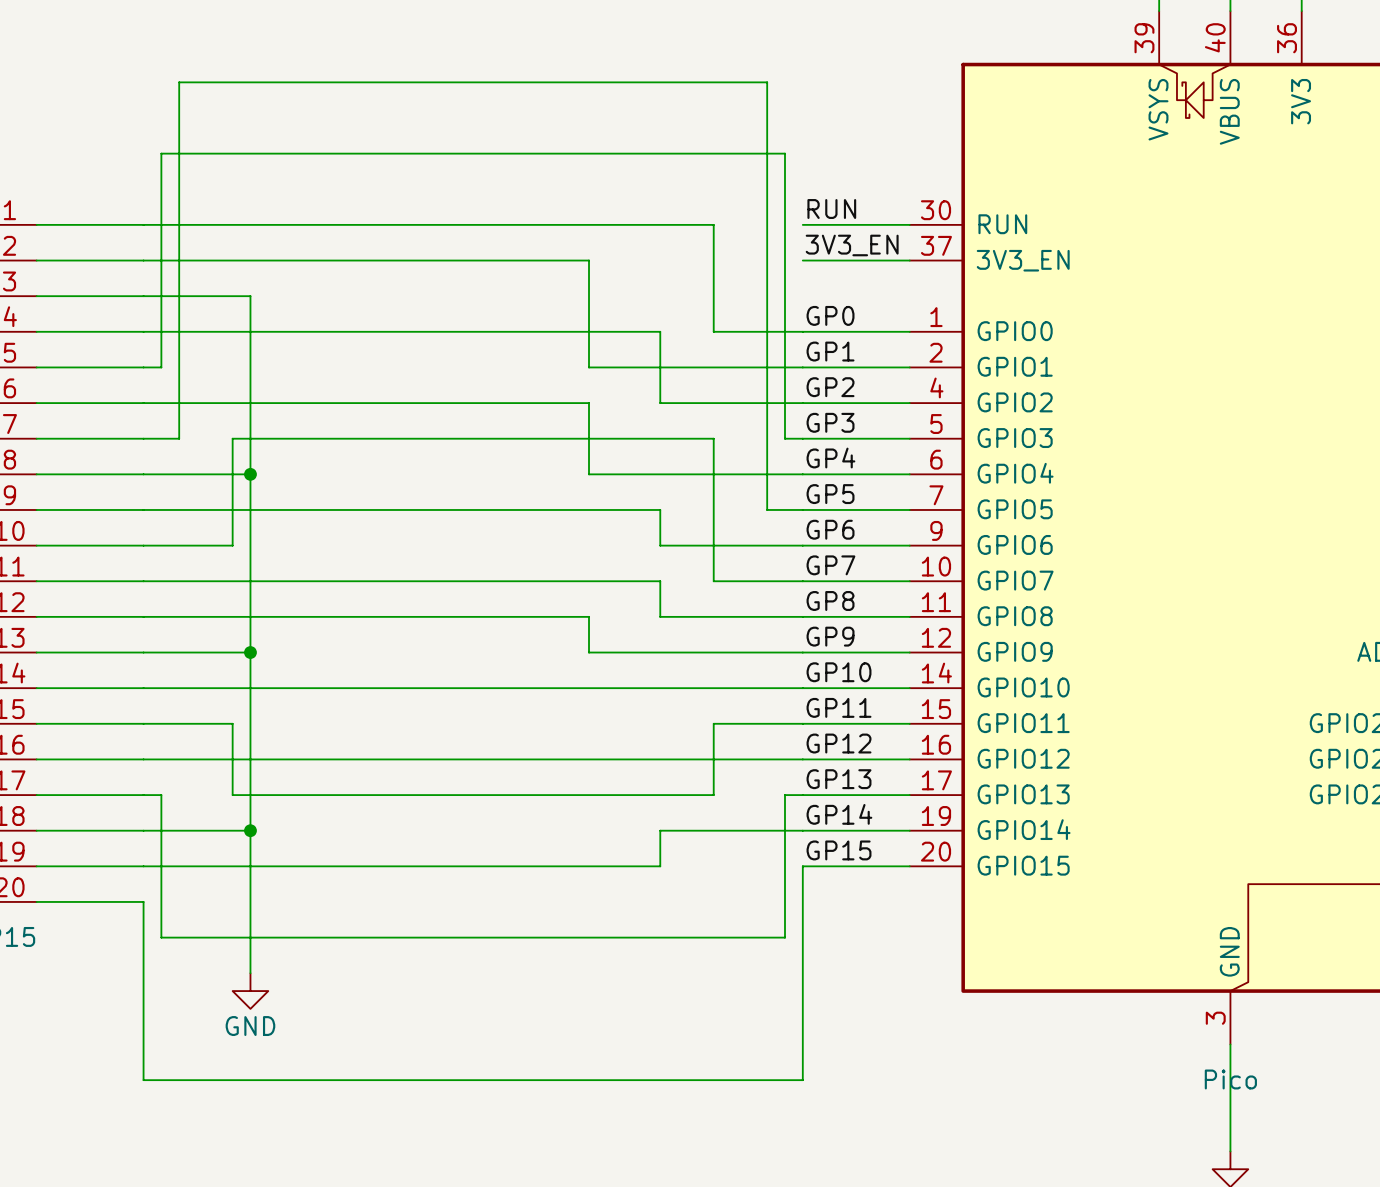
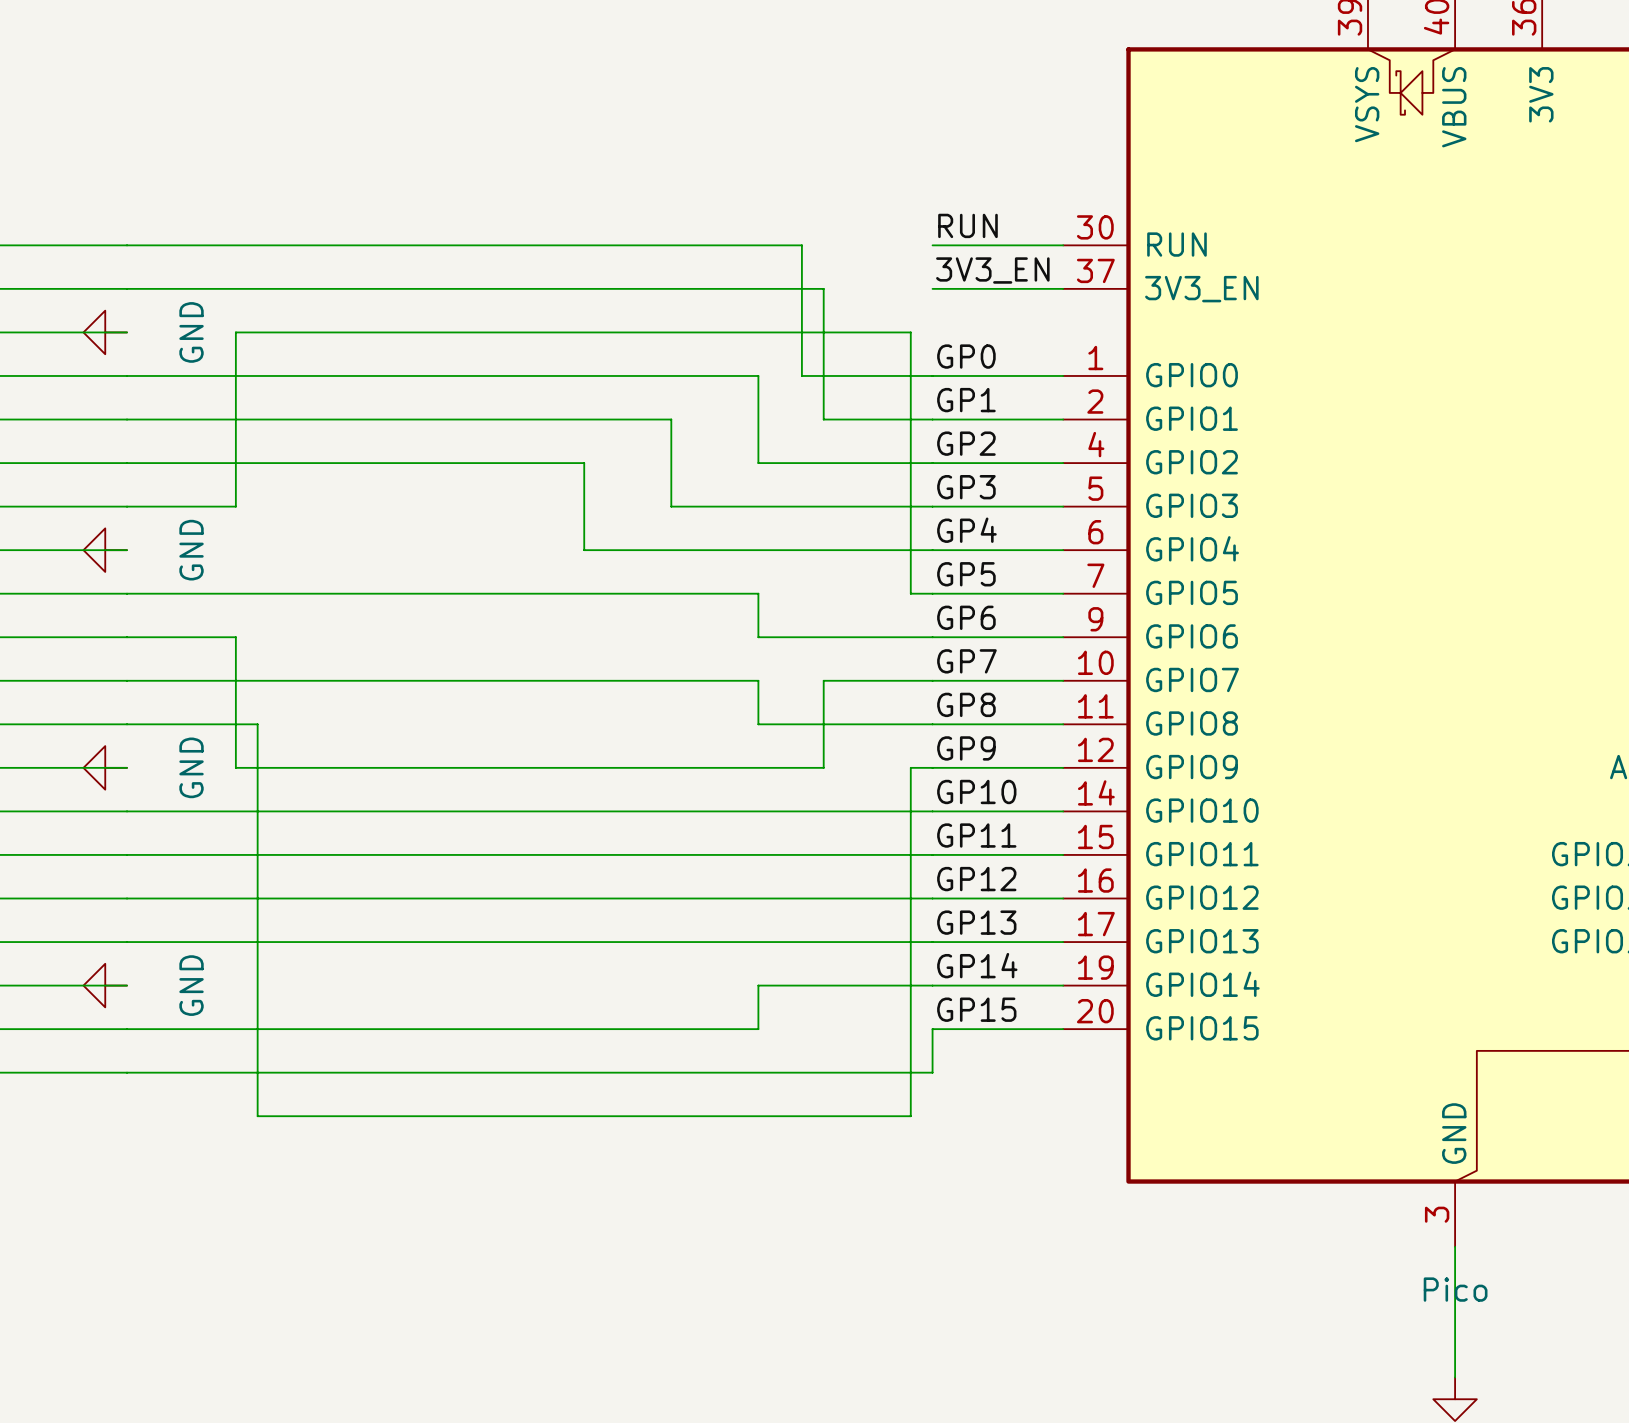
wire: (695, 224) (713, 224) (713, 260) -> (801, 245) (801, 375) (823, 375) (823, 419)
wire: (589, 260) (589, 367) (713, 367) -> (671, 288) (823, 288)
power symbol: none -> GND (105, 332)
wire: (143, 296) (232, 296) -> (170, 506) (235, 506) (235, 332)
wire: (250, 296) (250, 616) (589, 616) (589, 652) -> (257, 767) (671, 767)
wire: (784, 296) (784, 153) (161, 153) (161, 367) -> (910, 332) (257, 332)
wire: none -> (148, 419) (671, 419) (671, 463)
wire: (517, 403) (589, 403) -> (584, 463) (584, 550) (671, 550)
wire: (179, 438) (179, 82) (767, 82) (767, 509) (784, 509) -> none
wire: (713, 438) (713, 581) -> (823, 506) (910, 506) (910, 593)
power symbol: none -> GND (105, 550)
wire: (143, 474) (250, 474) -> none
junction: (250, 474) -> none
wire: (589, 474) (589, 438) (232, 438) (232, 545) -> none
power symbol: none -> GND (105, 767)
wire: (143, 652) (232, 652) -> (235, 637) (235, 767)
junction: (250, 652) -> none
wire: (713, 652) (784, 652) -> (823, 767) (823, 680)
wire: (232, 723) (232, 795) -> (148, 942) (235, 942)
wire: none -> (235, 854) (823, 854)
wire: (713, 723) (713, 795) -> (910, 767) (910, 942) (823, 942)
wire: (161, 795) (161, 937) (250, 937) (250, 973) -> none
power symbol: none -> GND (105, 985)
wire: (143, 830) (250, 830) -> none
junction: (250, 830) -> none
wire: (143, 901) (143, 1080) (802, 1080) (802, 901) -> (127, 1072) (932, 1072)
power symbol: GND (250, 991) -> none

